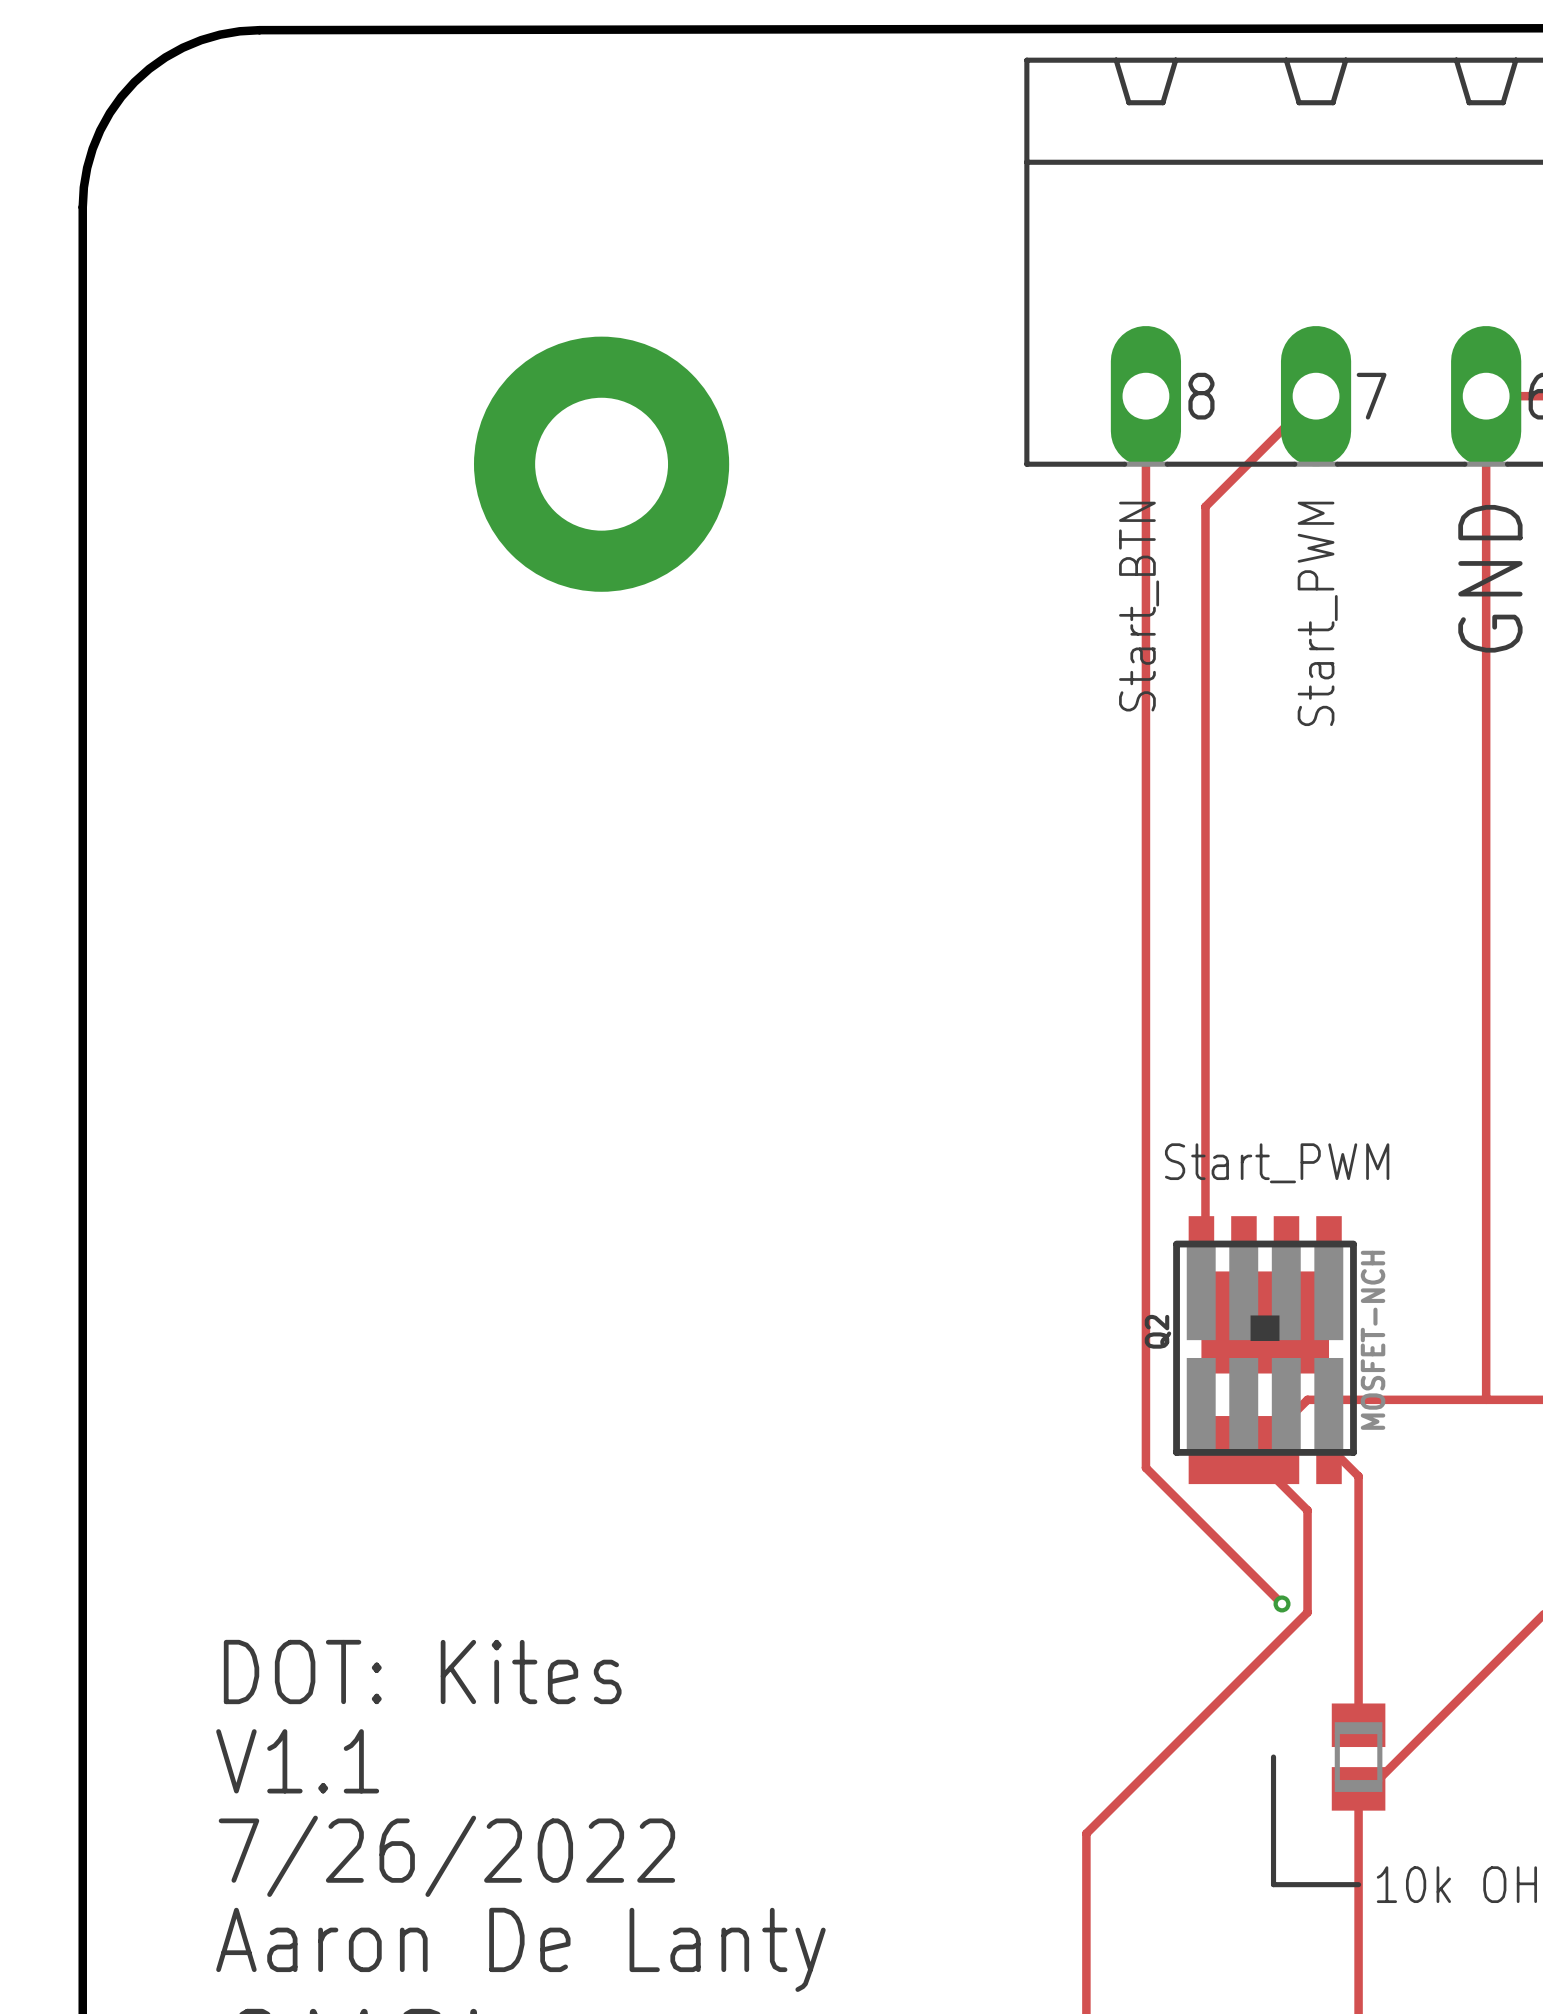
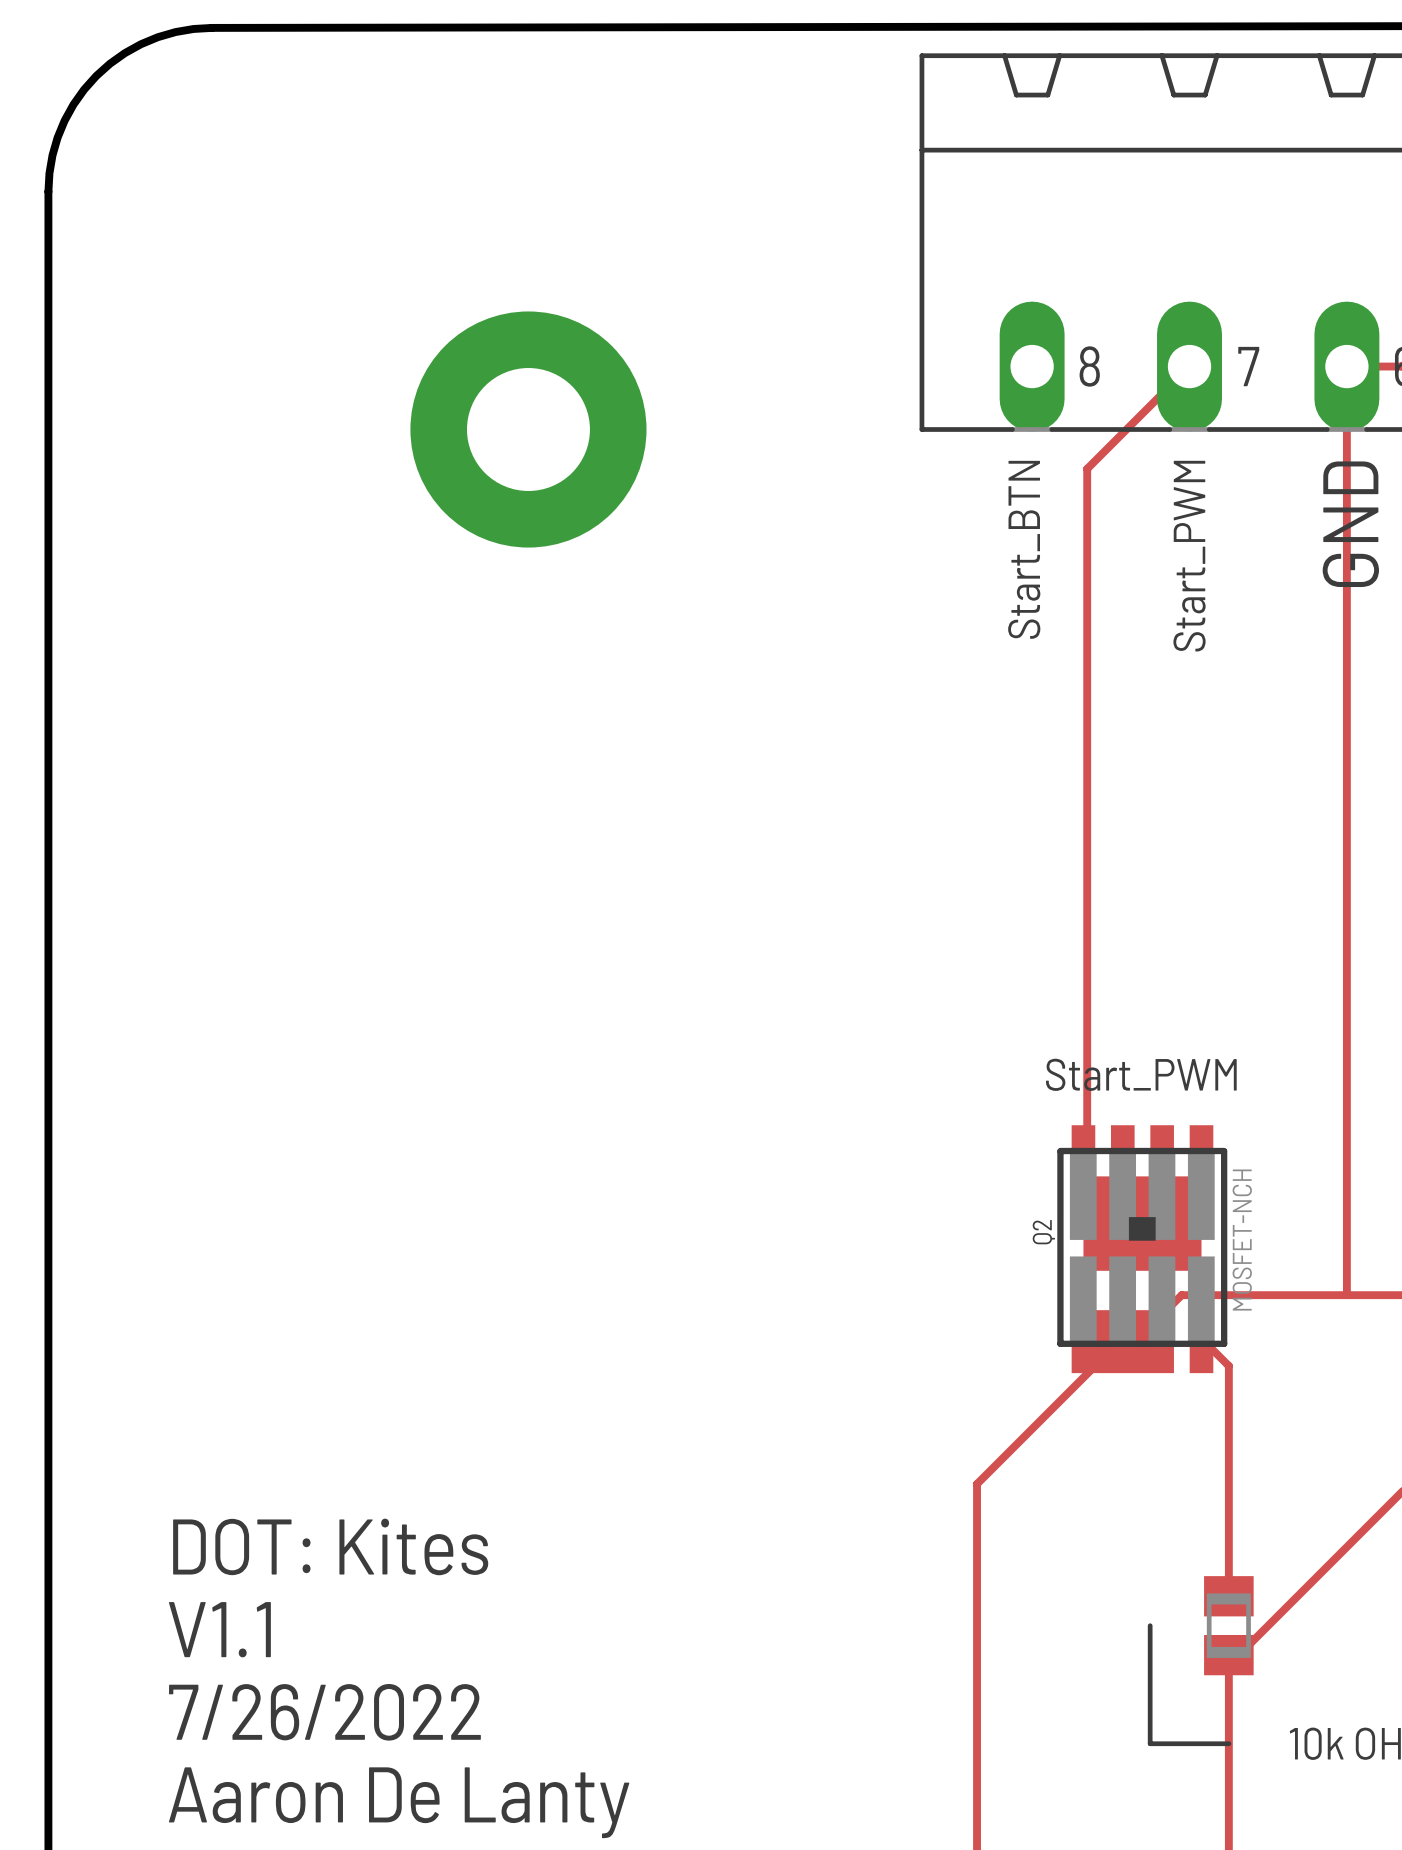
track: (1145, 396) (1145, 1467) (1282, 1603) -> none
track: (1243, 1450) (1248, 1450) (1307, 1510) (1307, 1612) (1086, 1833) -> (1122, 1341) (1118, 1342) (977, 1484) (977, 1696)
via: (1282, 1603) -> none

